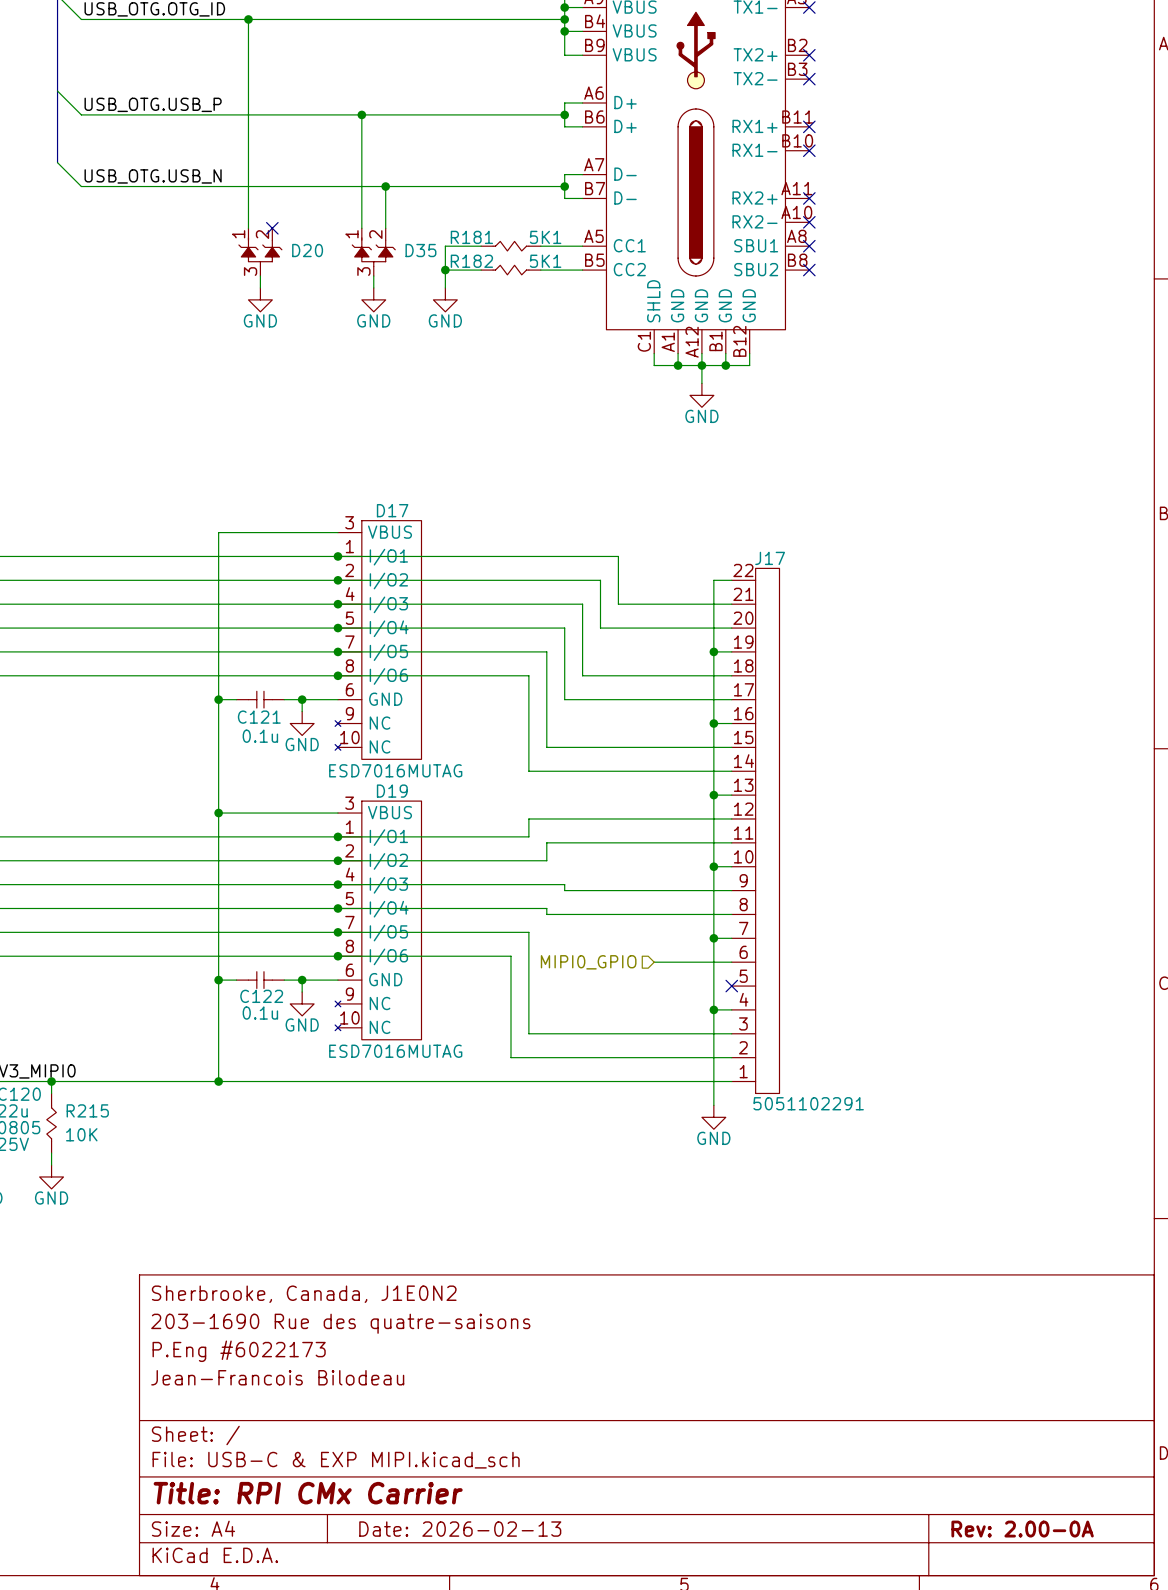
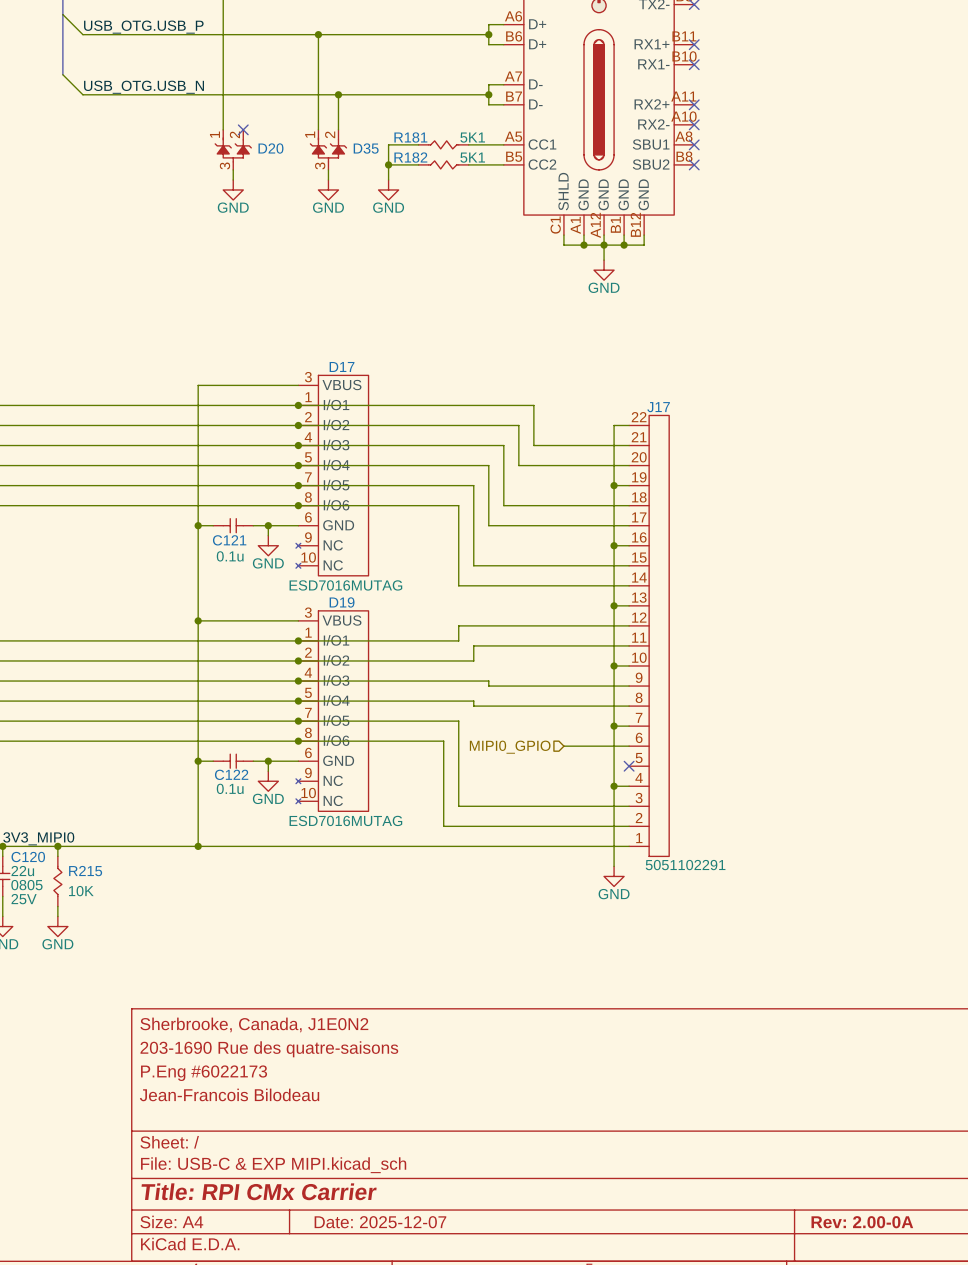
title block: Date: 2026-02-13 (460, 1529) -> Date: 2025-12-07 (380, 1222)

